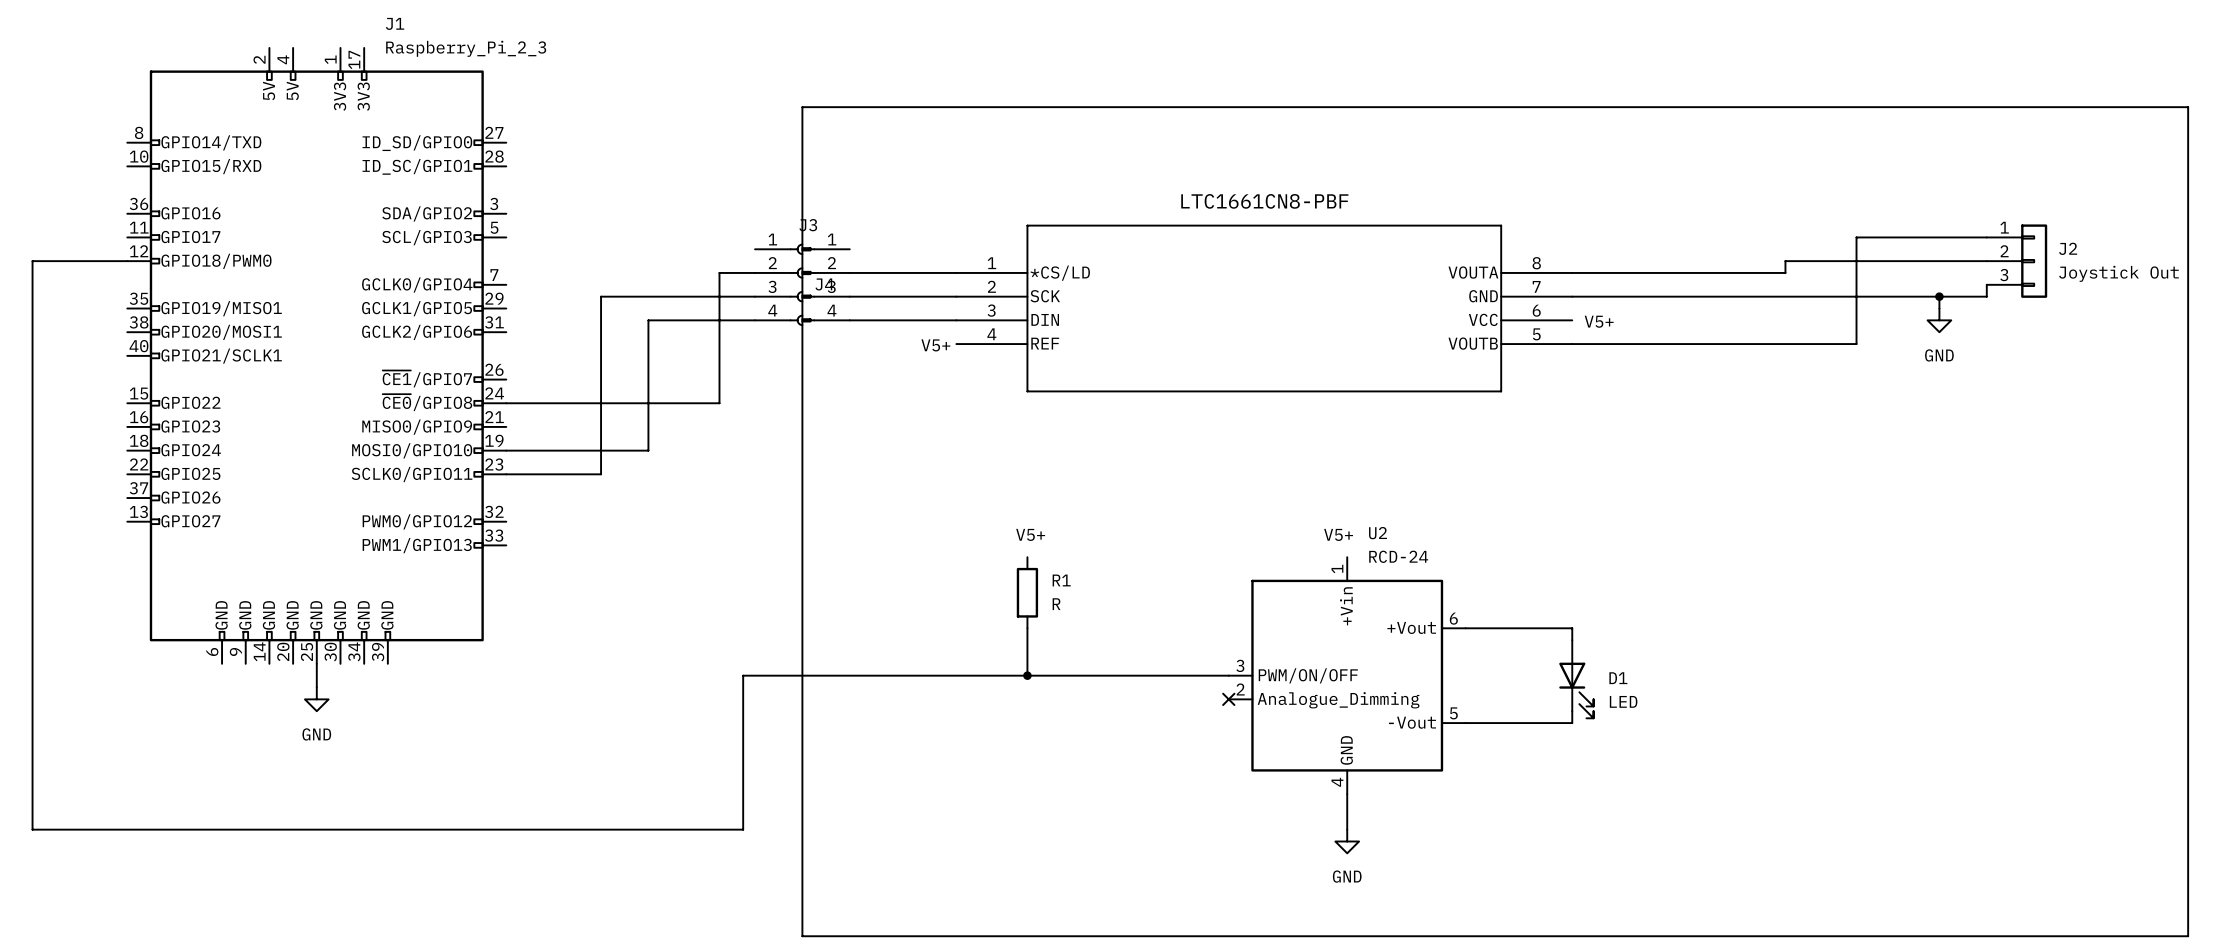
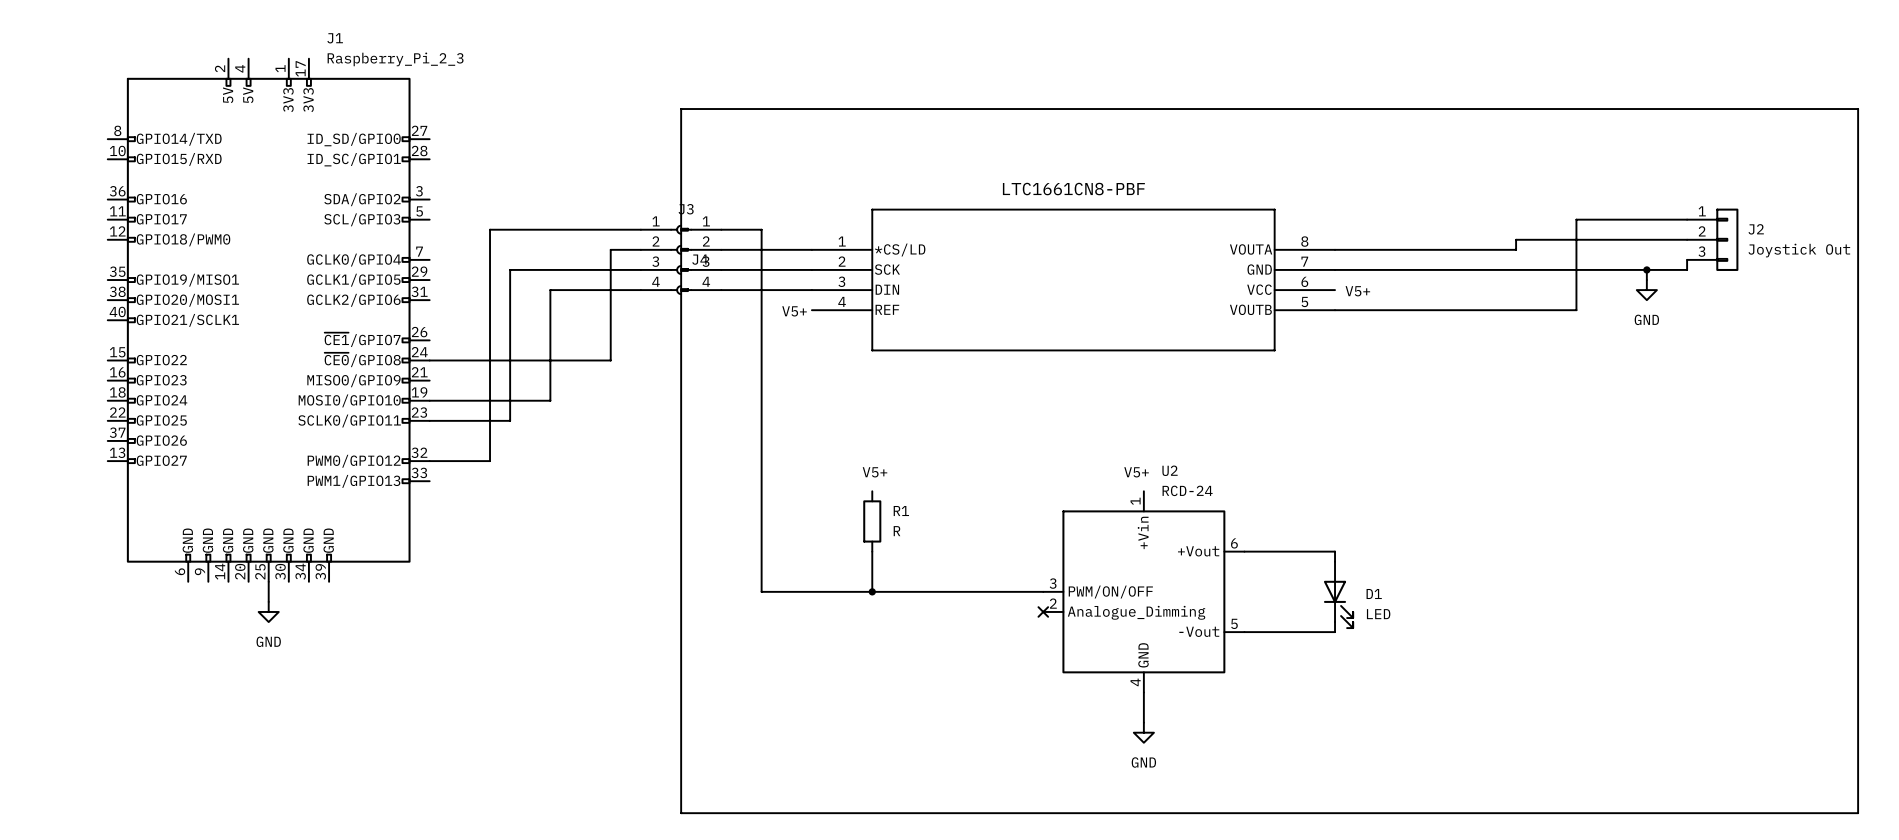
wire: none -> (640, 229) (490, 229) (490, 461) (429, 461)
wire: (127, 261) (32, 261) (32, 829) (743, 829) (743, 675) (897, 675) -> (721, 229) (761, 229) (761, 591)

